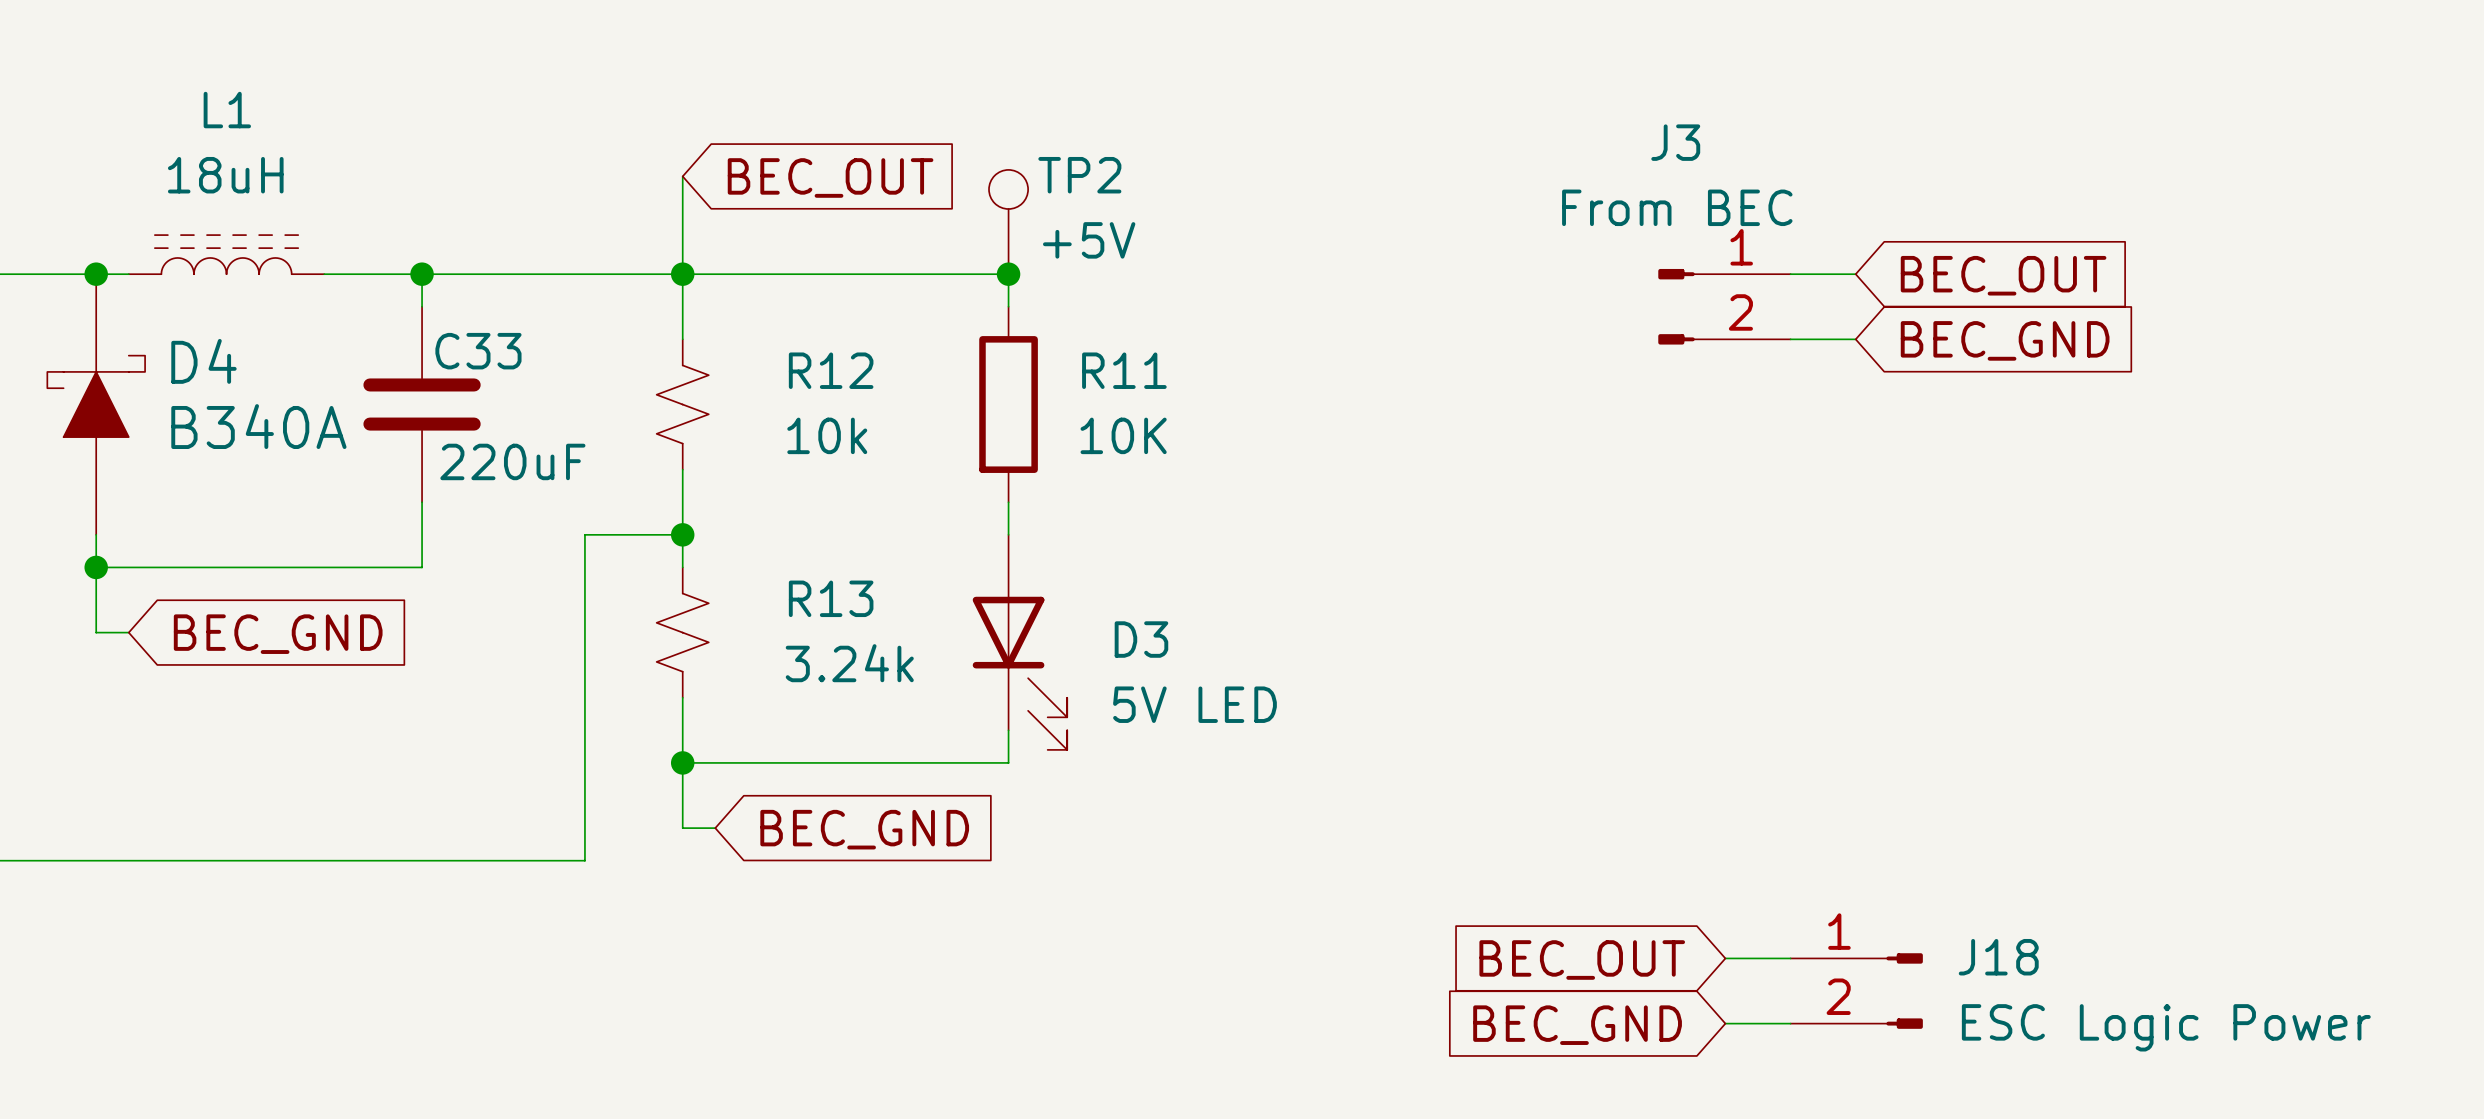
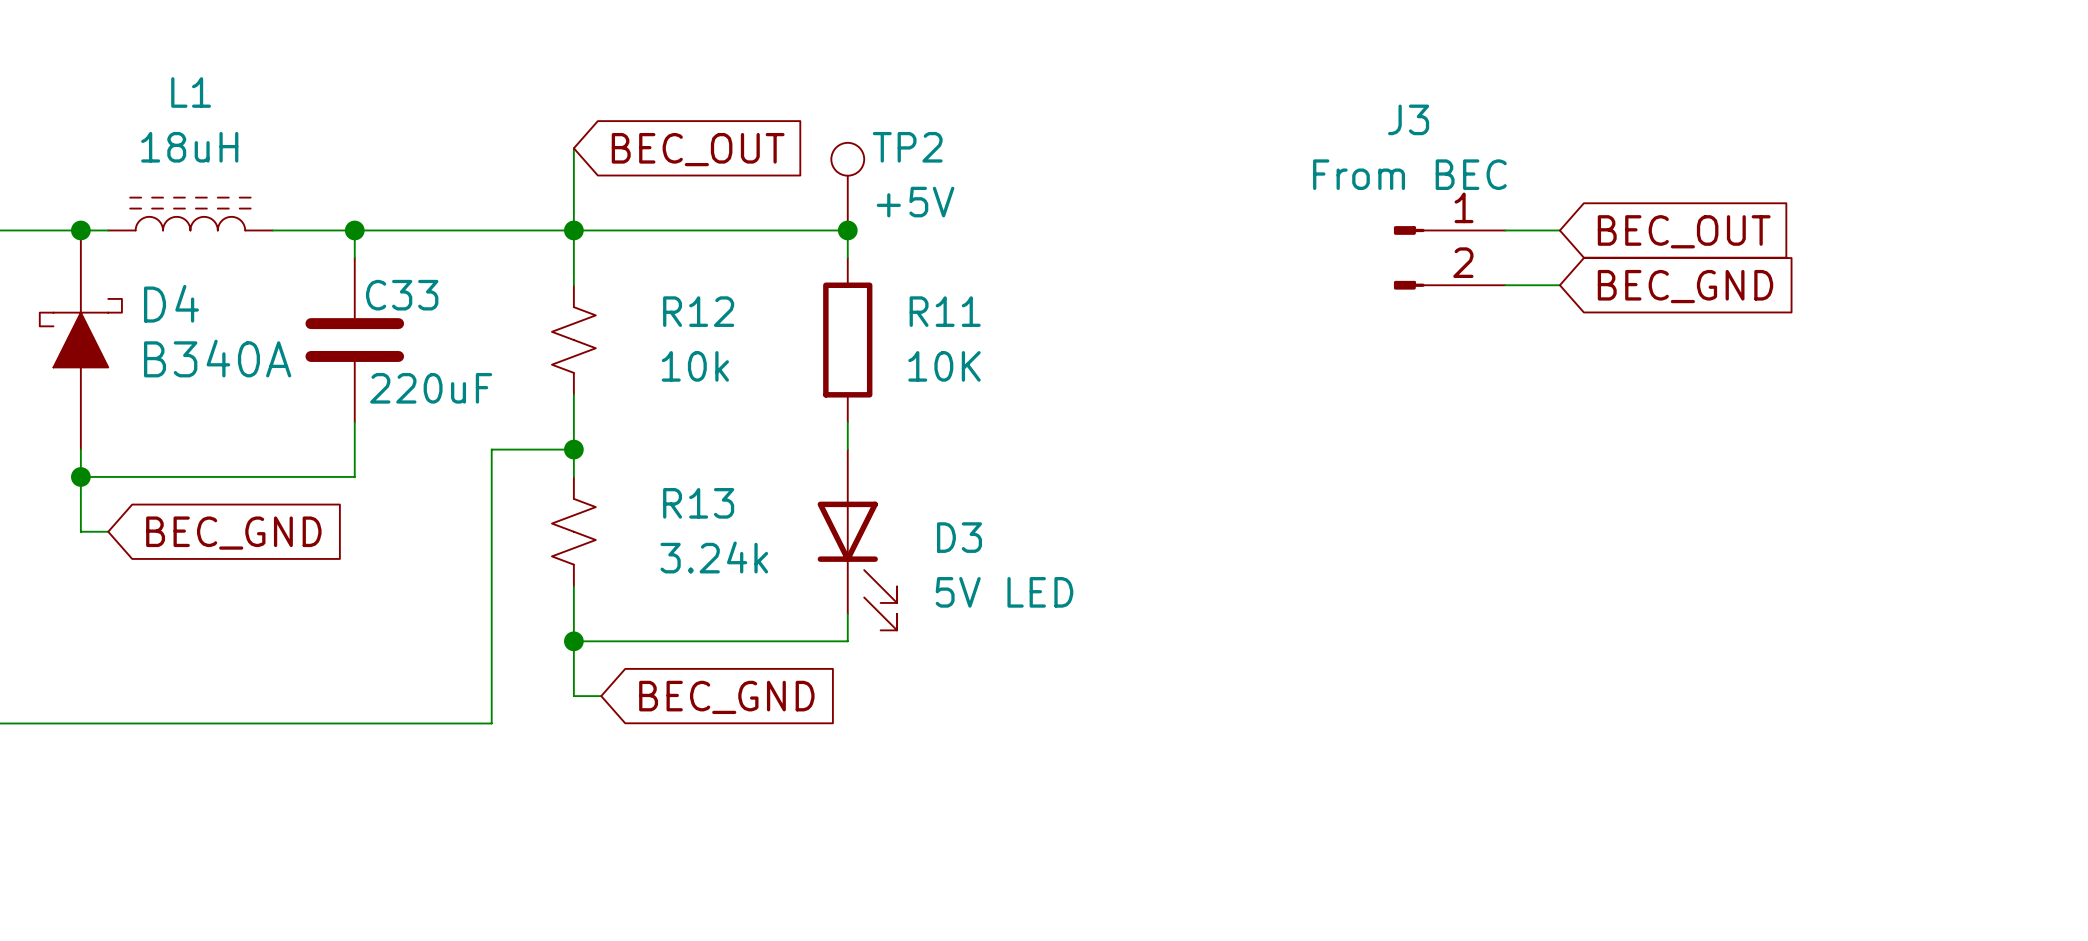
wire: (1725, 958) (1790, 958) -> none
global label: BEC_OUT (1582, 960) -> none
J18: ESC Logic Power (1856, 991) -> none
wire: (1725, 1023) (1790, 1023) -> none
global label: BEC_GND (1577, 1025) -> none

